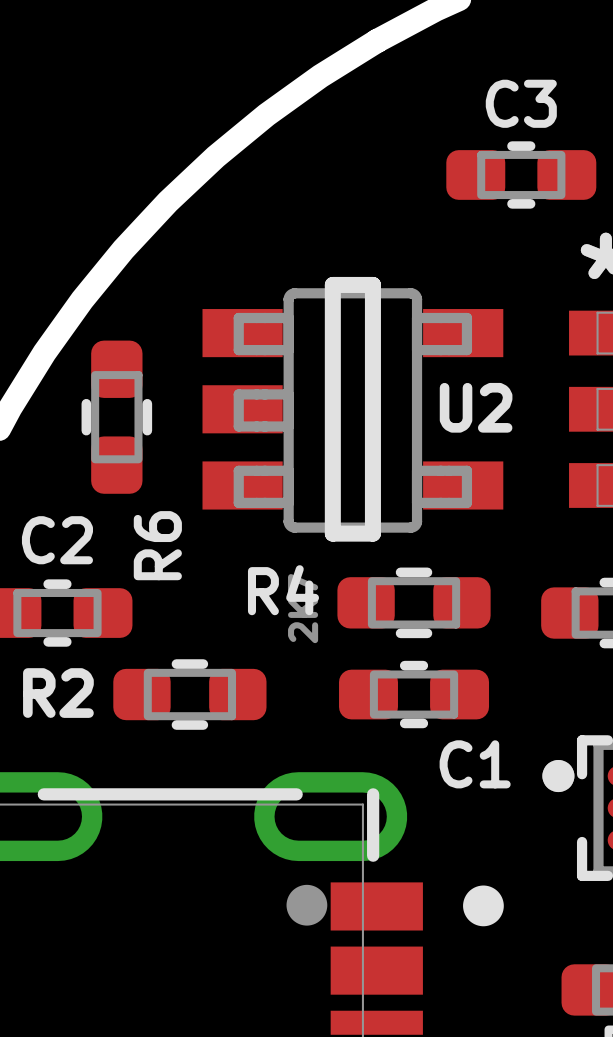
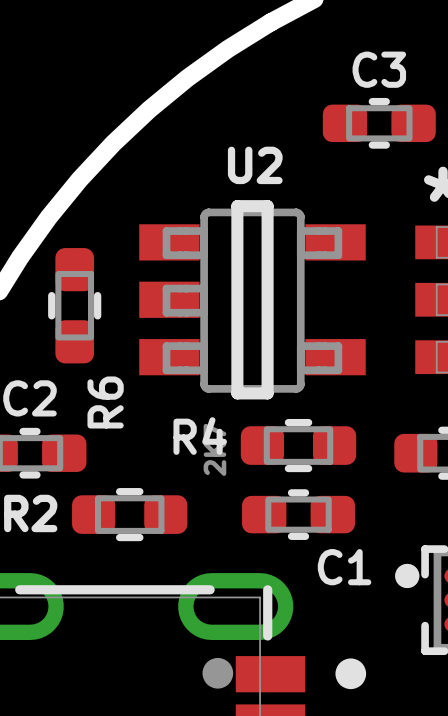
U2 name position: U2 (476, 407) -> U2 (255, 165)

